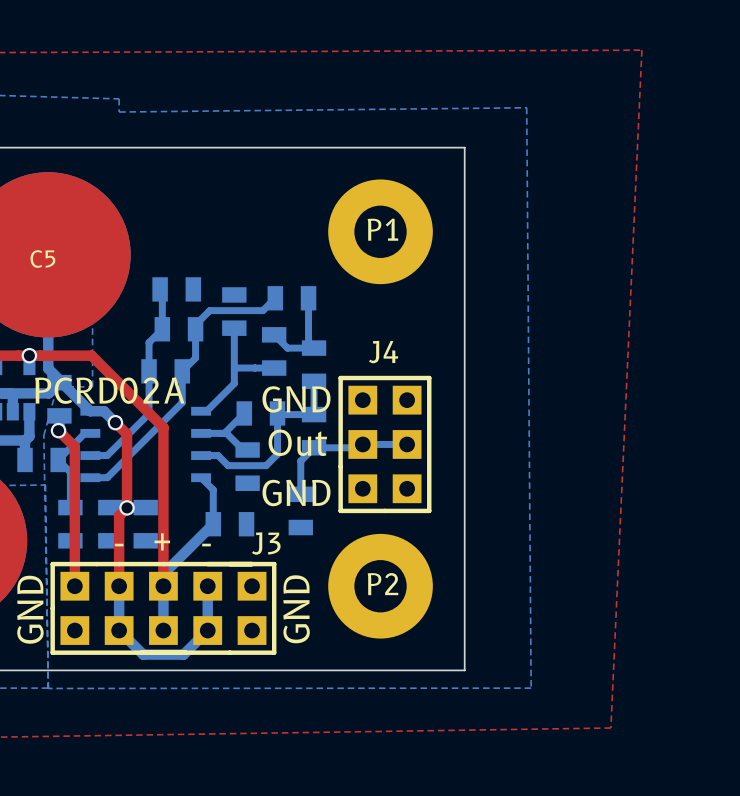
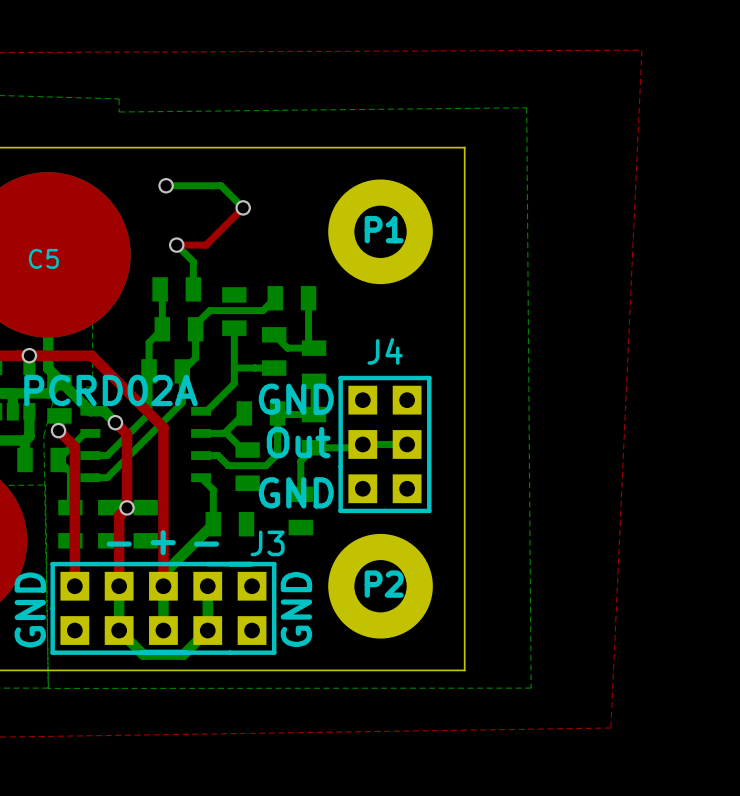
bottom track: none -> (166, 185) (221, 185) (243, 207)
via: none -> (166, 185)
top track: none -> (243, 207) (205, 245) (176, 245)
via: none -> (243, 207)
bottom track: none -> (176, 245) (193, 261) (193, 289)
via: none -> (176, 245)

